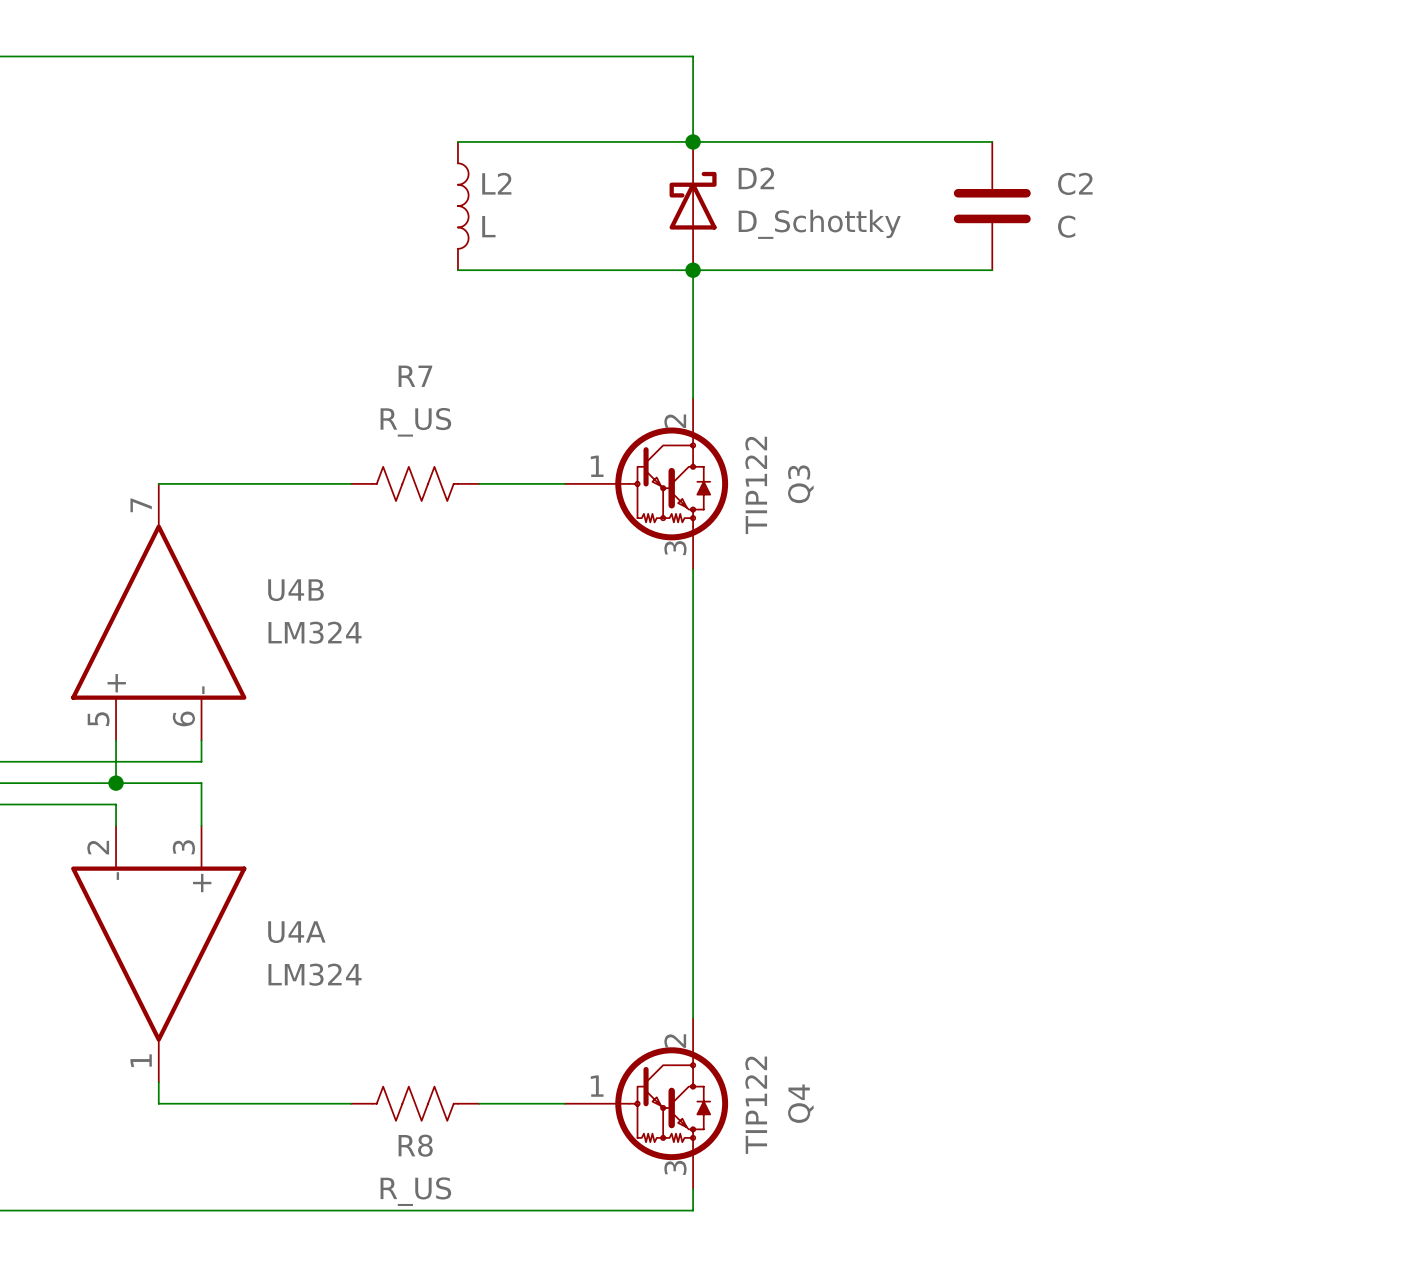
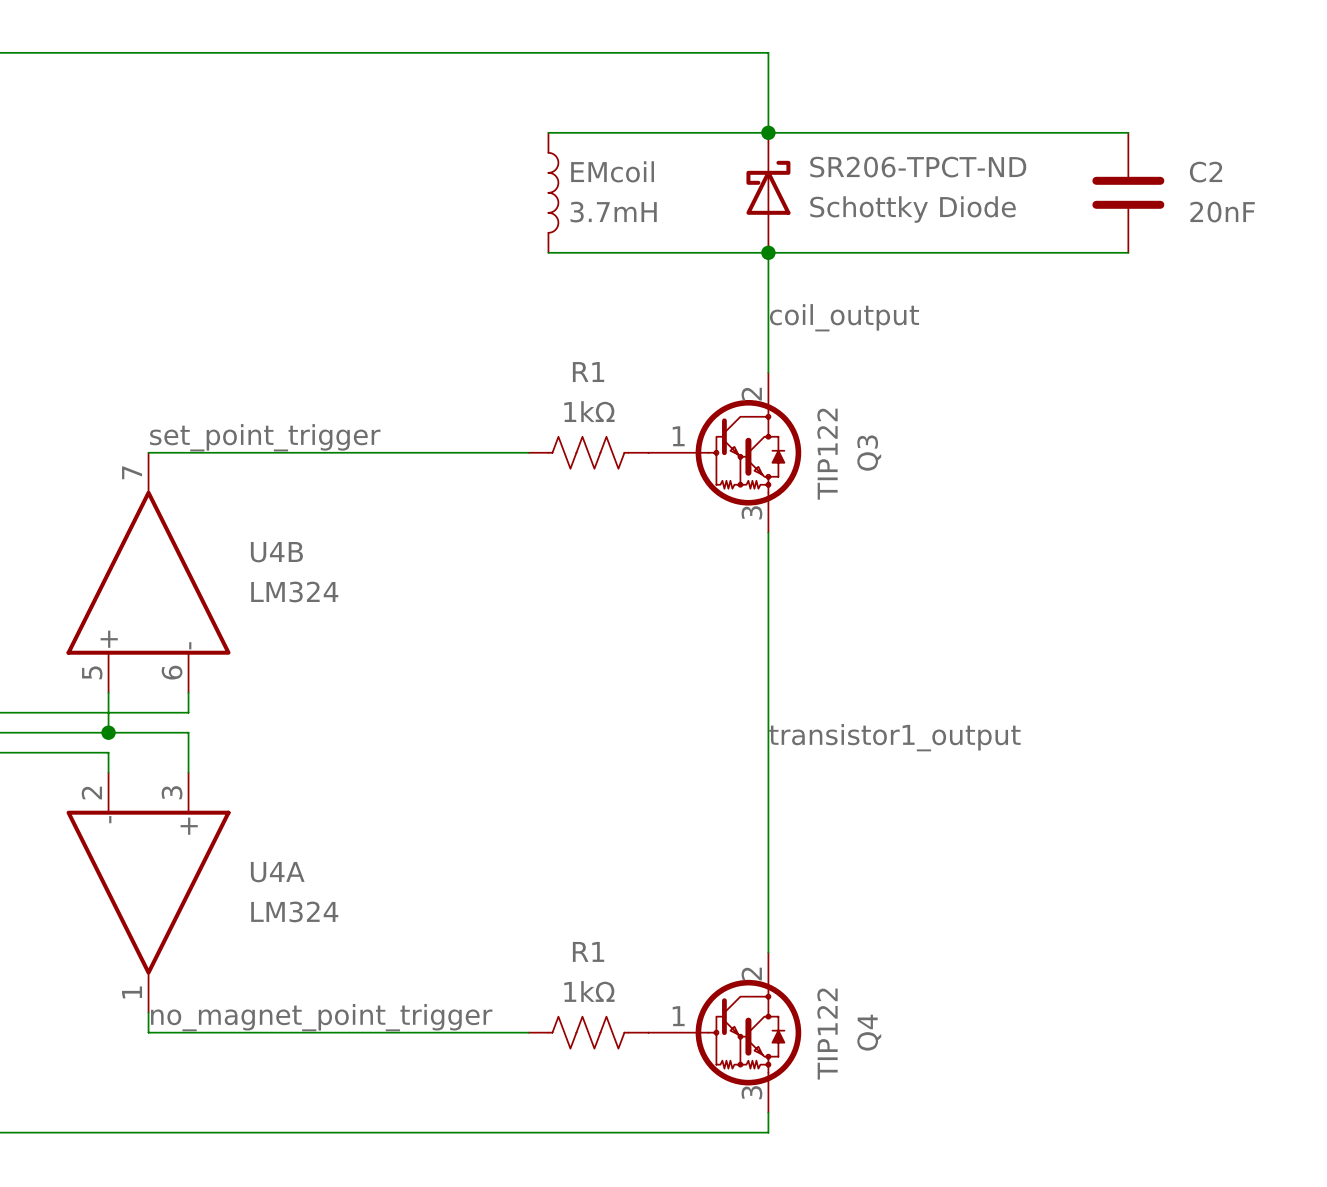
wire: (693, 56) (693, 141) -> (648, 52) (768, 52) (768, 132)
wire: (457, 141) (586, 141) -> none
junction: (693, 141) -> none
junction: none -> (768, 132)
wire: none -> (928, 132) (1128, 132)
L2: L (463, 206) -> none
EMcoil: none -> 3.7mH (553, 192)
D2: D_Schottky (693, 206) -> none
SR206-TPCT-ND: none -> Schottky Diode (768, 192)
C2 position: (992, 206) -> (1128, 192)
C2 value: C (1066, 226) -> 20nF (1222, 212)
wire: (457, 270) (586, 270) -> (328, 452) (448, 452)
wire: (693, 270) (693, 398) -> (768, 252) (768, 372)
junction: (693, 270) -> none
junction: none -> (768, 252)
wire: none -> (928, 252) (1128, 252)
label: none -> coil_output (844, 317)
label: none -> set_point_trigger (265, 437)
R7: R_US (415, 483) -> none
R1: none -> 1kΩ (588, 452)
Q3 position: (646, 483) -> (724, 452)
wire: (693, 569) (693, 1018) -> (768, 532) (768, 952)
label: none -> transistor1_output (894, 737)
label: none -> no_magnet_point_trigger (321, 1017)
wire: none -> (328, 1032) (448, 1032)
R8: R_US (415, 1103) -> none
R1: none -> 1kΩ (588, 1032)
Q4 position: (646, 1103) -> (724, 1032)
wire: (693, 1189) (693, 1210) -> (768, 1112) (768, 1132) (648, 1132)

